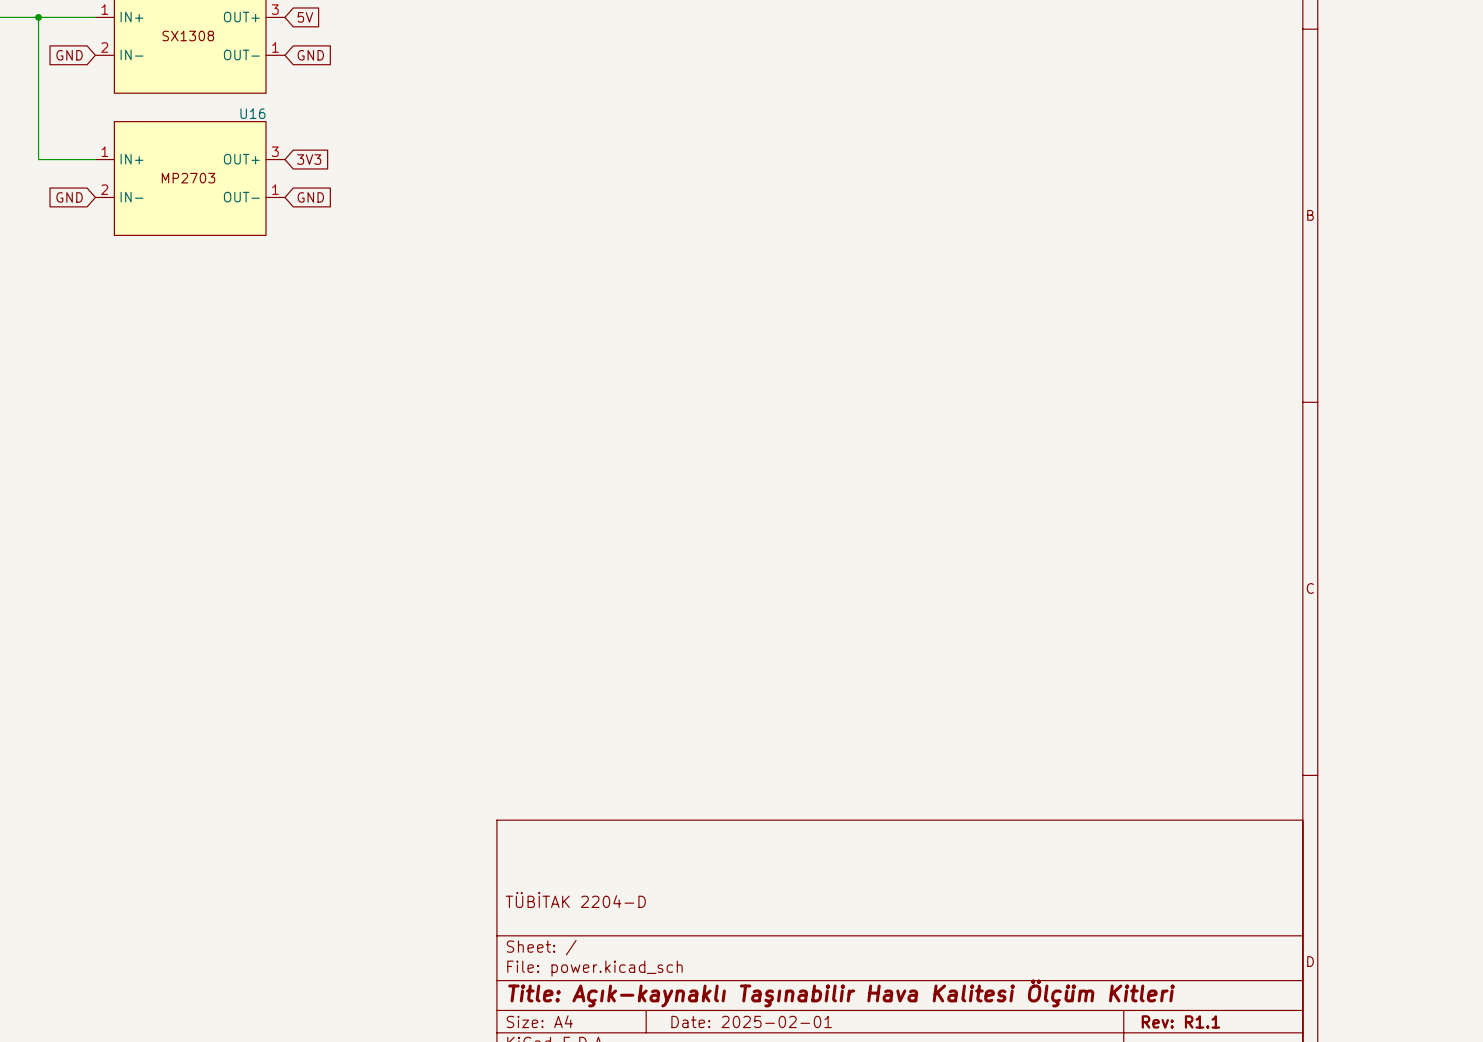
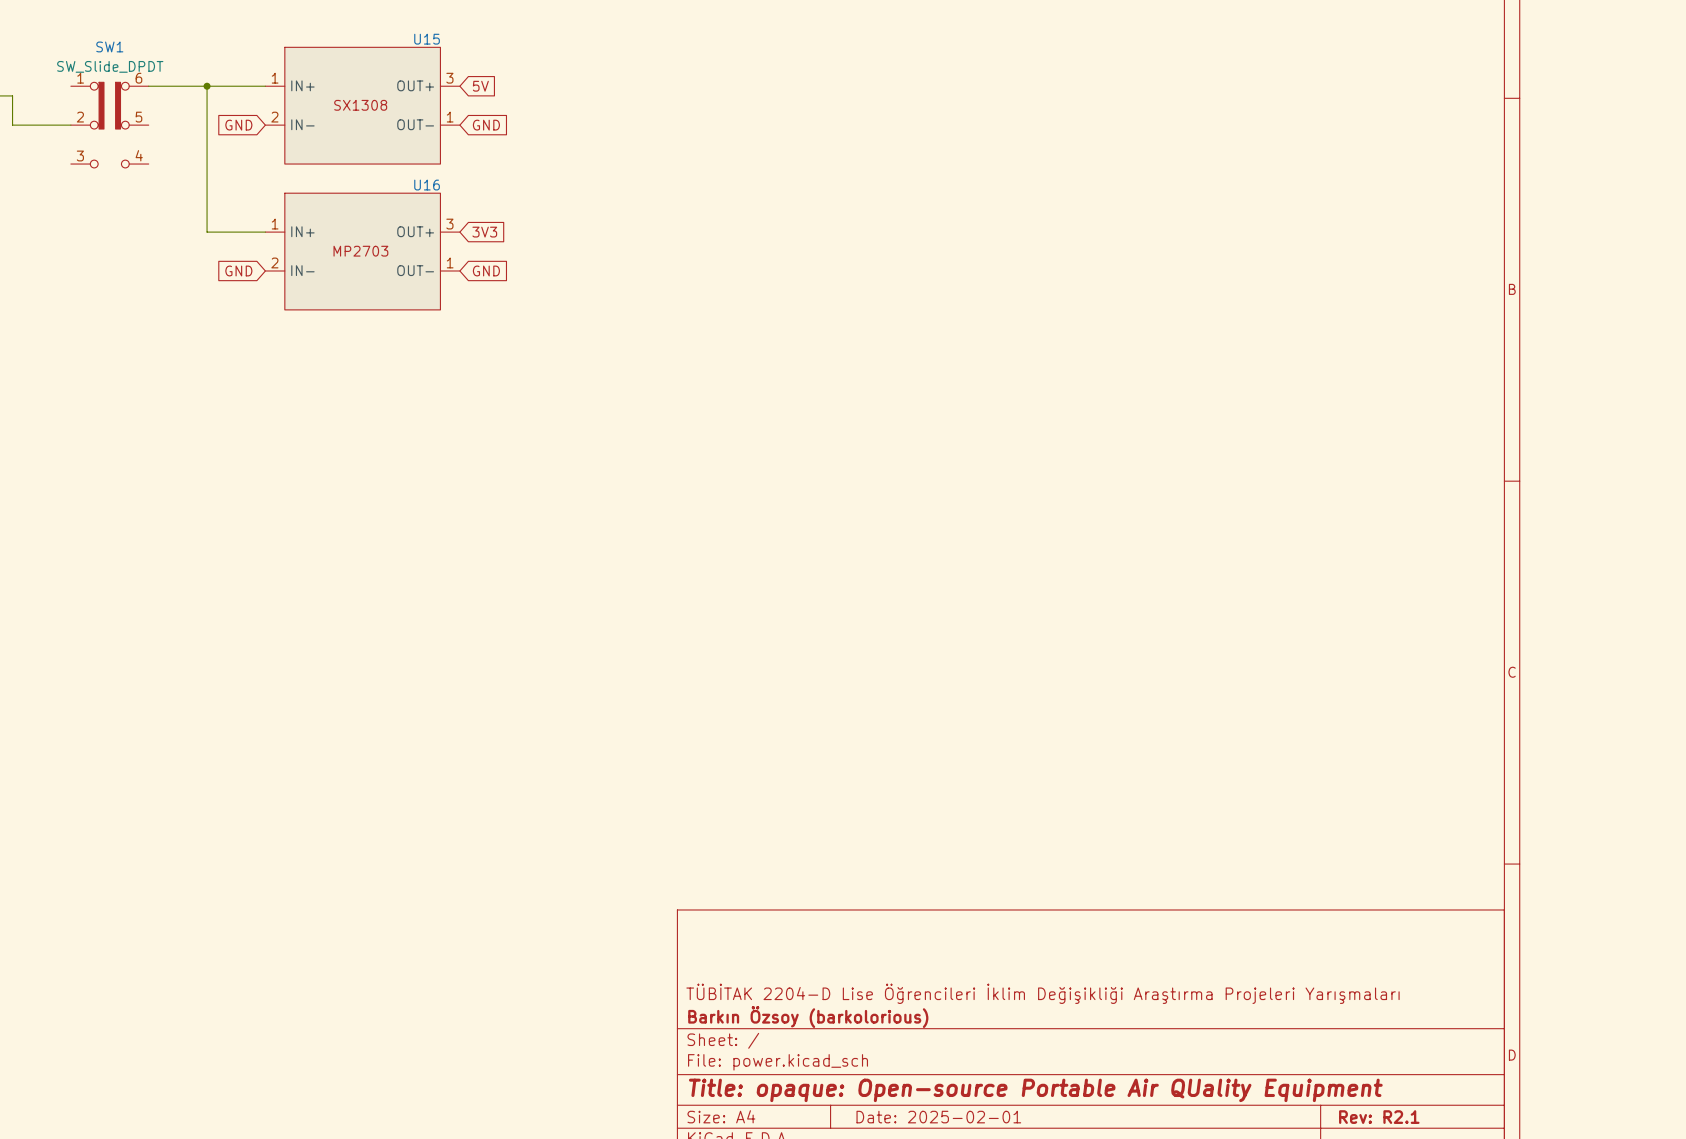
title block: TÜBİTAK 2204-D (575, 899) -> TÜBİTAK 2204-D Lise Öğrencileri İklim Değişikliği Araştırma Projeleri Yarışmaları (1043, 993)
title block: none -> Barkın Özsoy (barkolorious) (808, 1017)
title block: Title: Açık-kaynaklı Taşınabilir Hava Kalitesi Ölçüm Kitleri (841, 993) -> Title: opaque: Open-source Portable Air QUality Equipment (1035, 1090)
title block: Rev: R1.1 (1180, 1021) -> Rev: R2.1 (1379, 1117)

